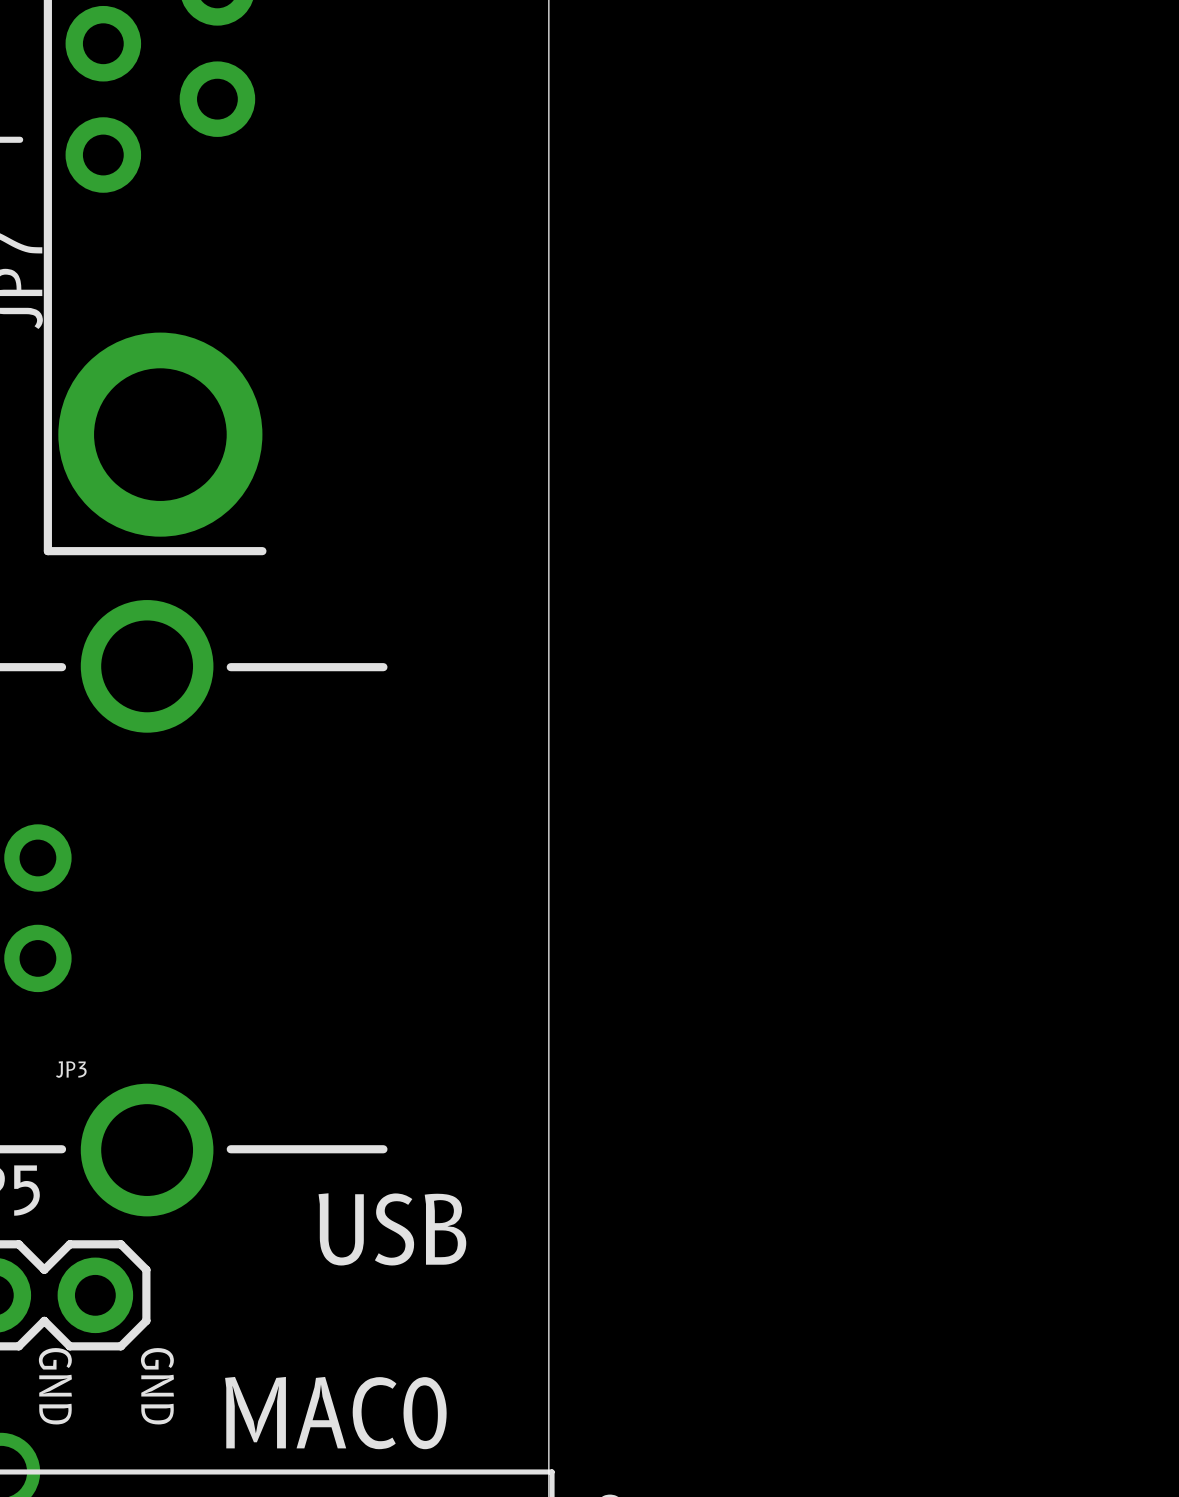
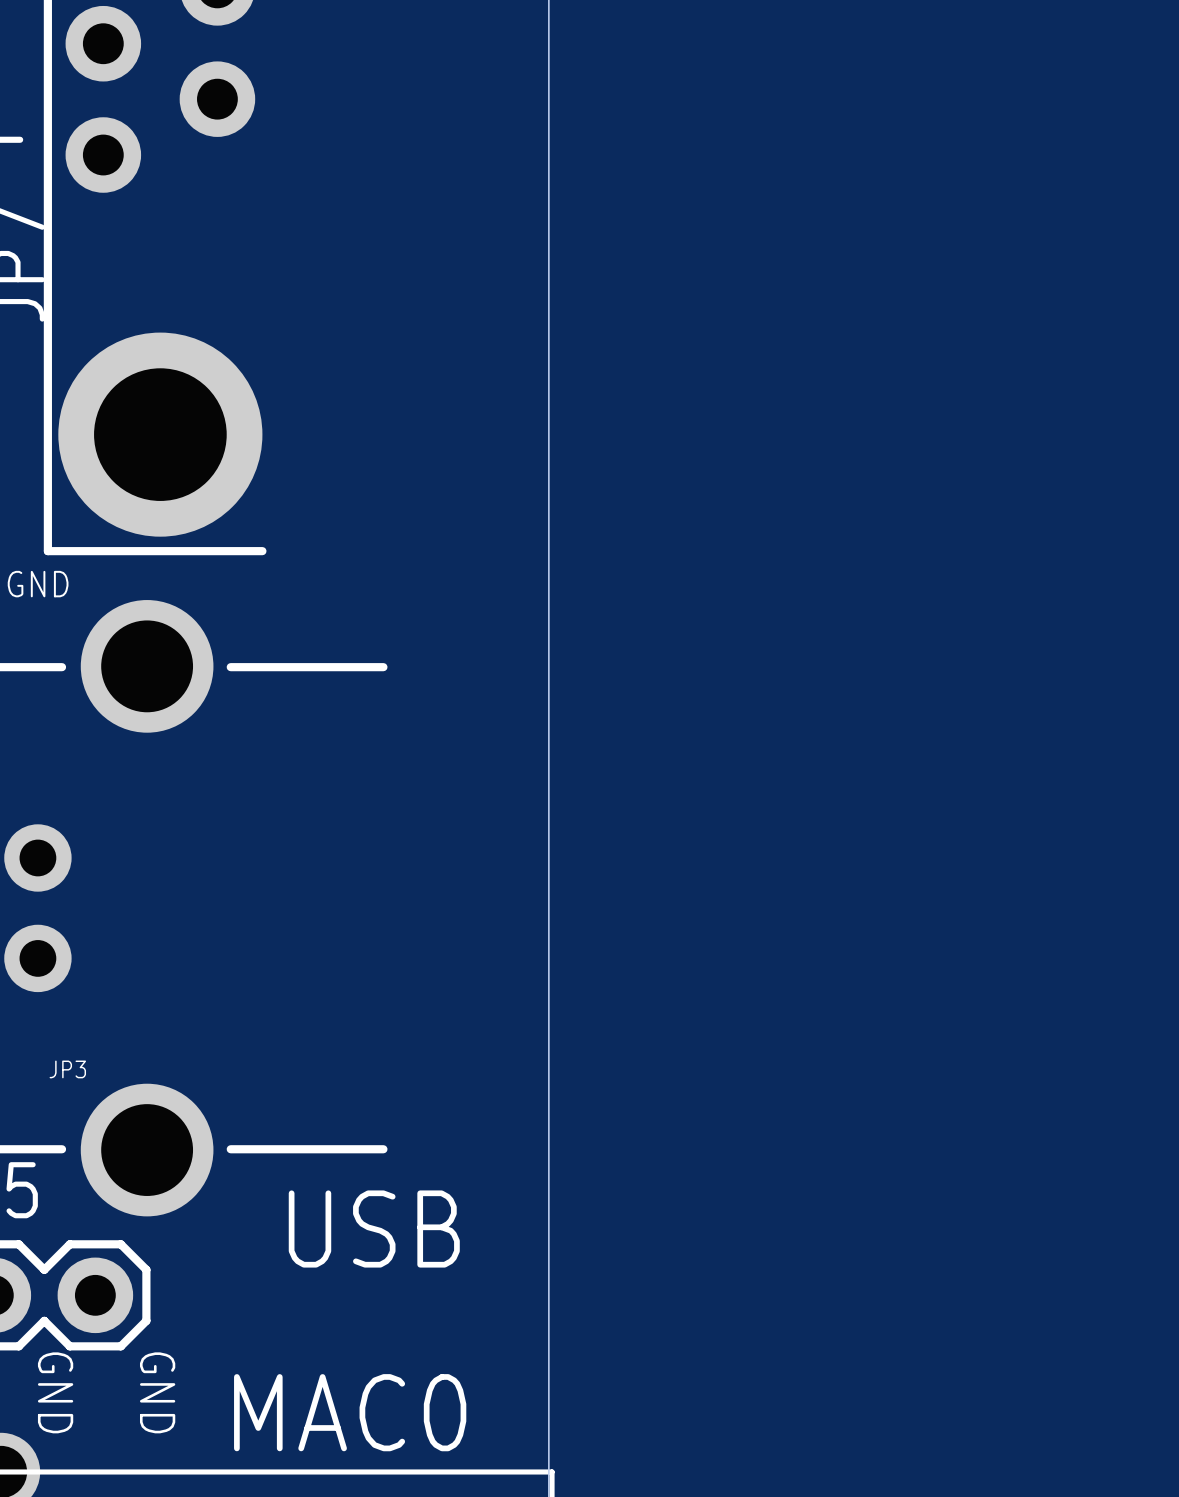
text: none -> GND (38, 584)

